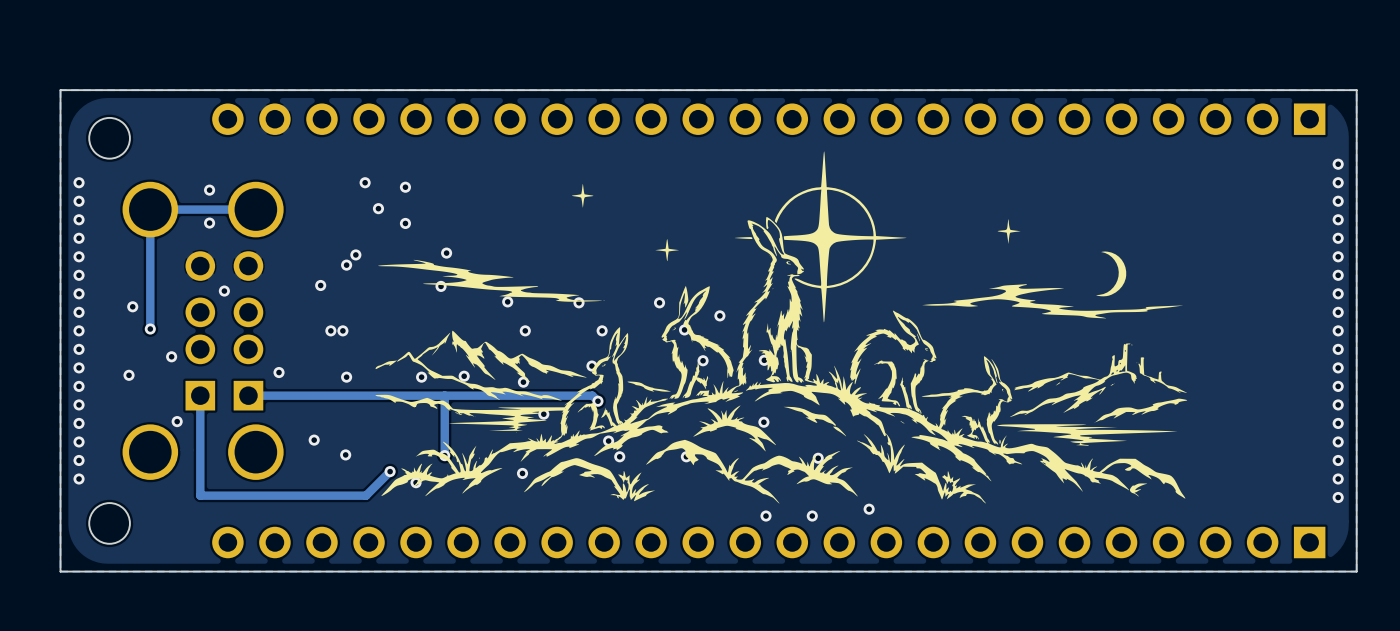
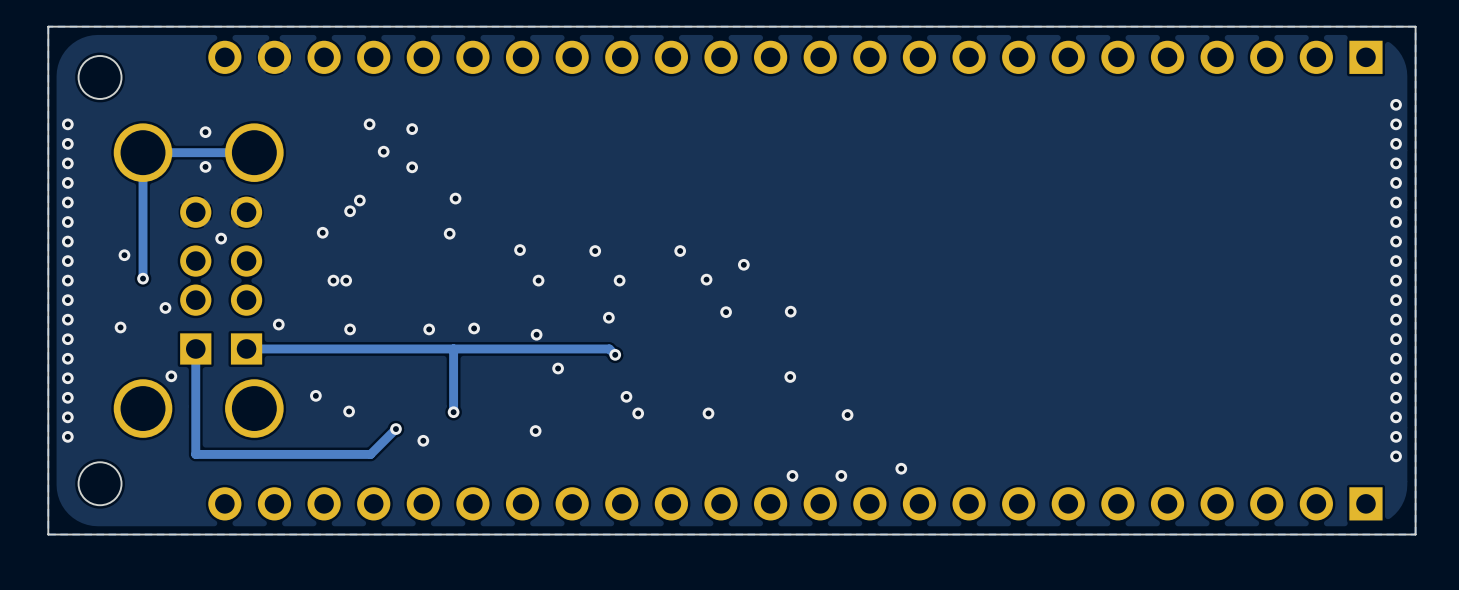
drawing: [375, 151, 1188, 504] -> none

